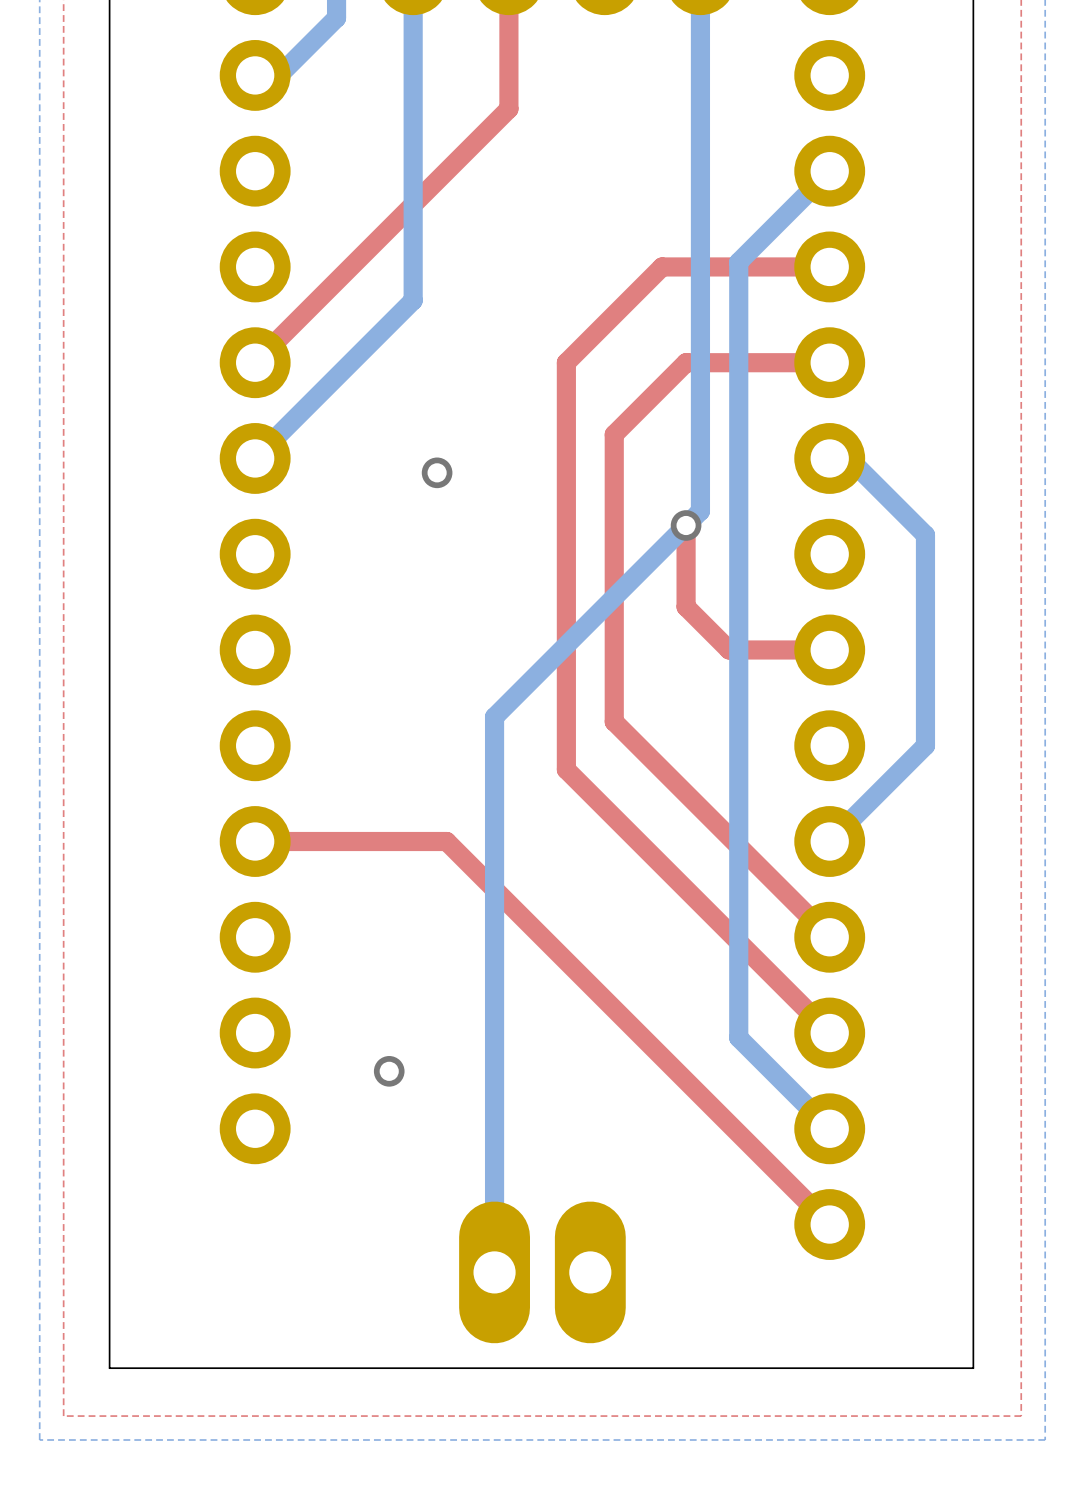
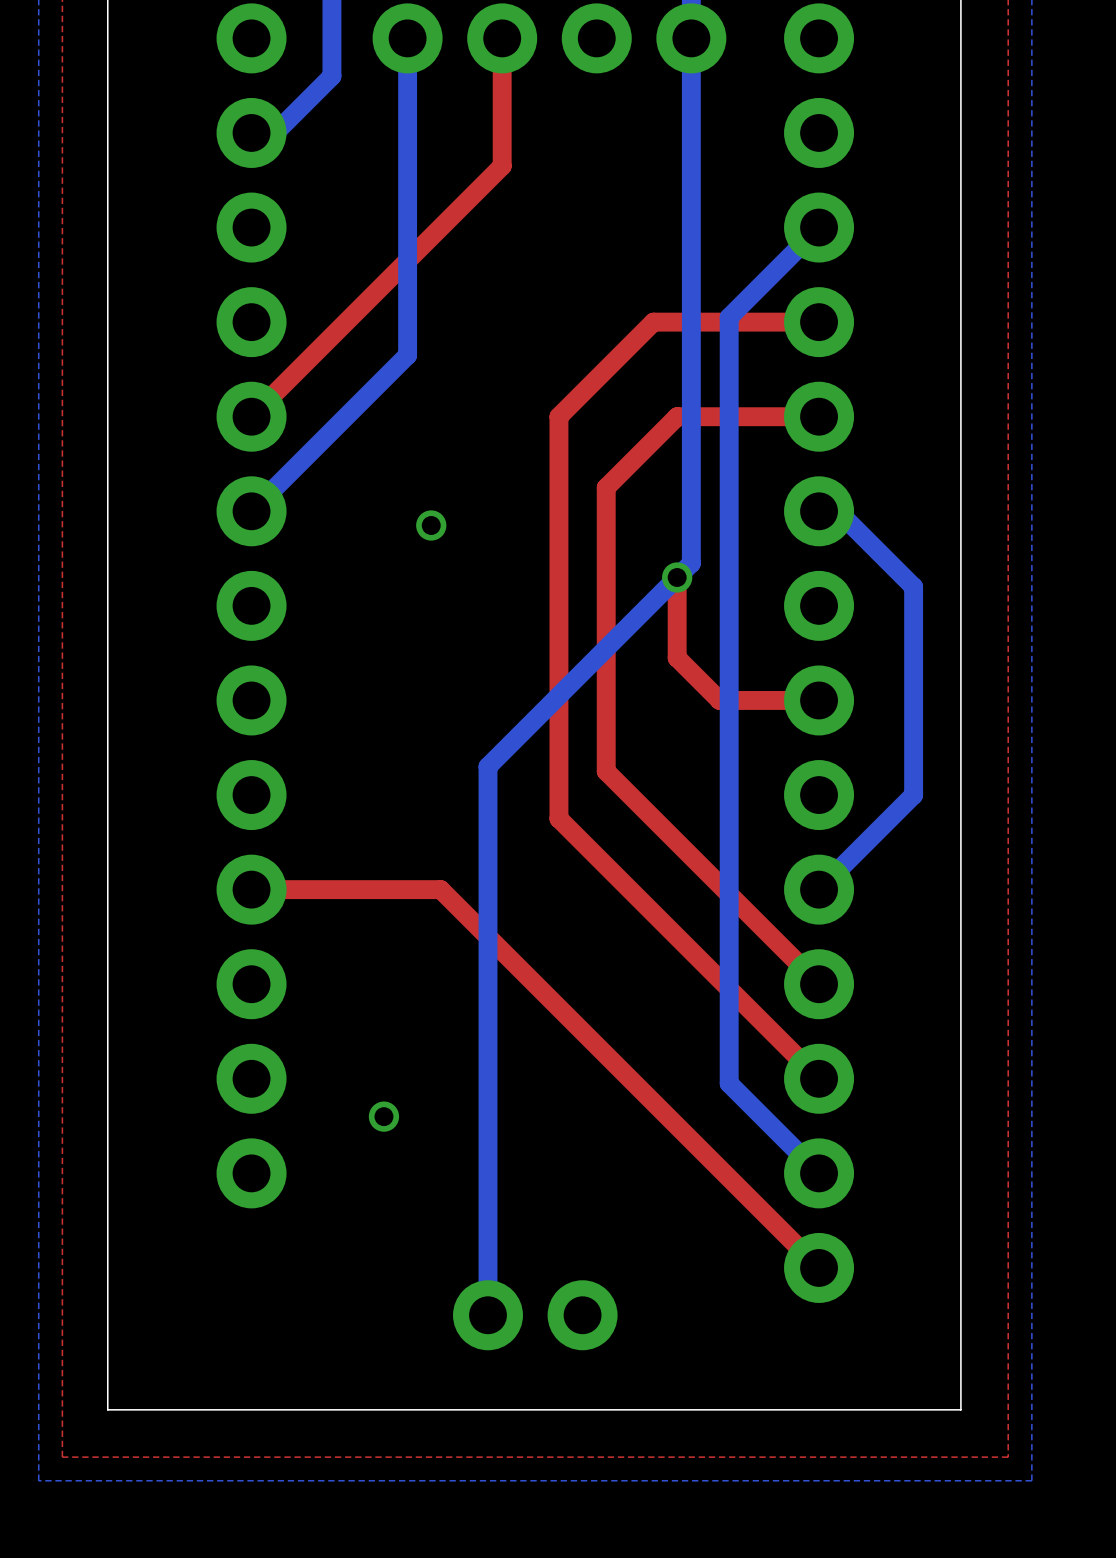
part footprint: [459, 1201, 626, 1344] -> [453, 1280, 618, 1351]

